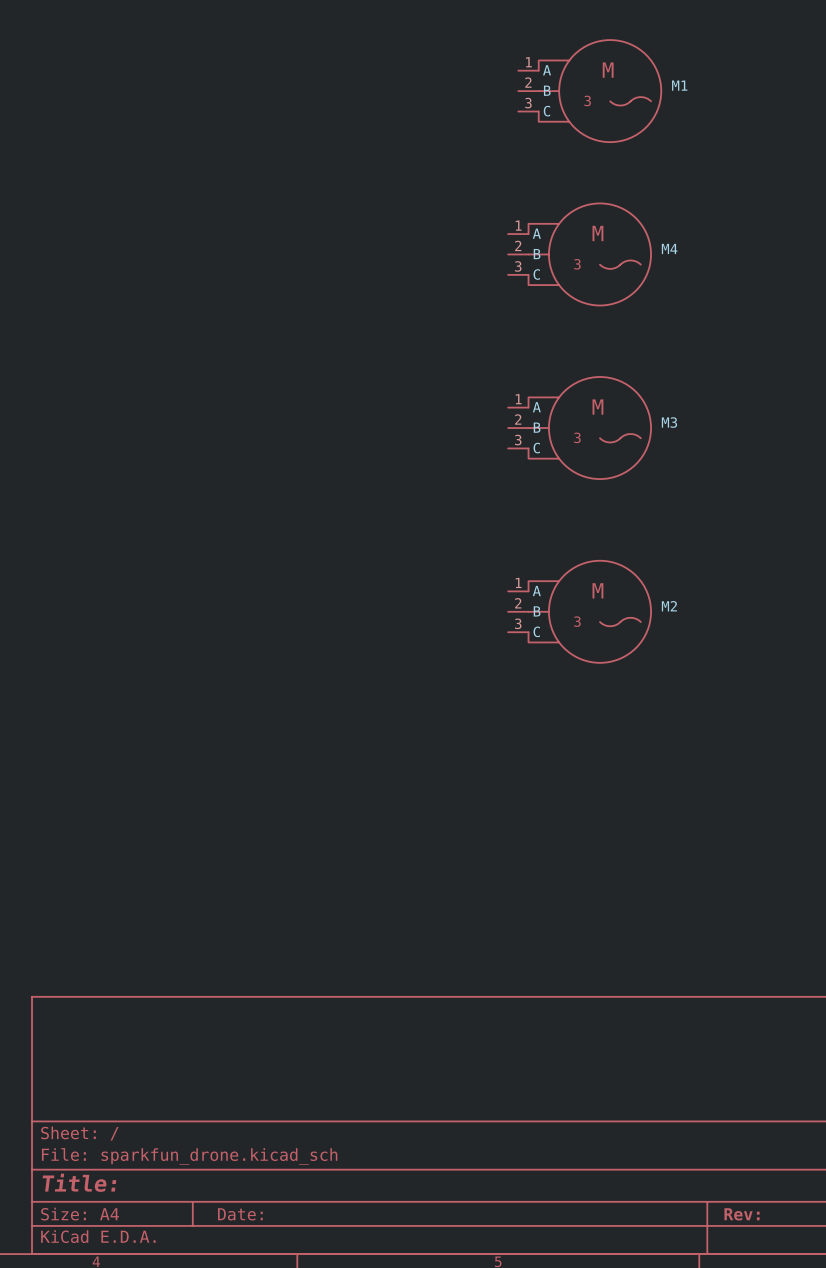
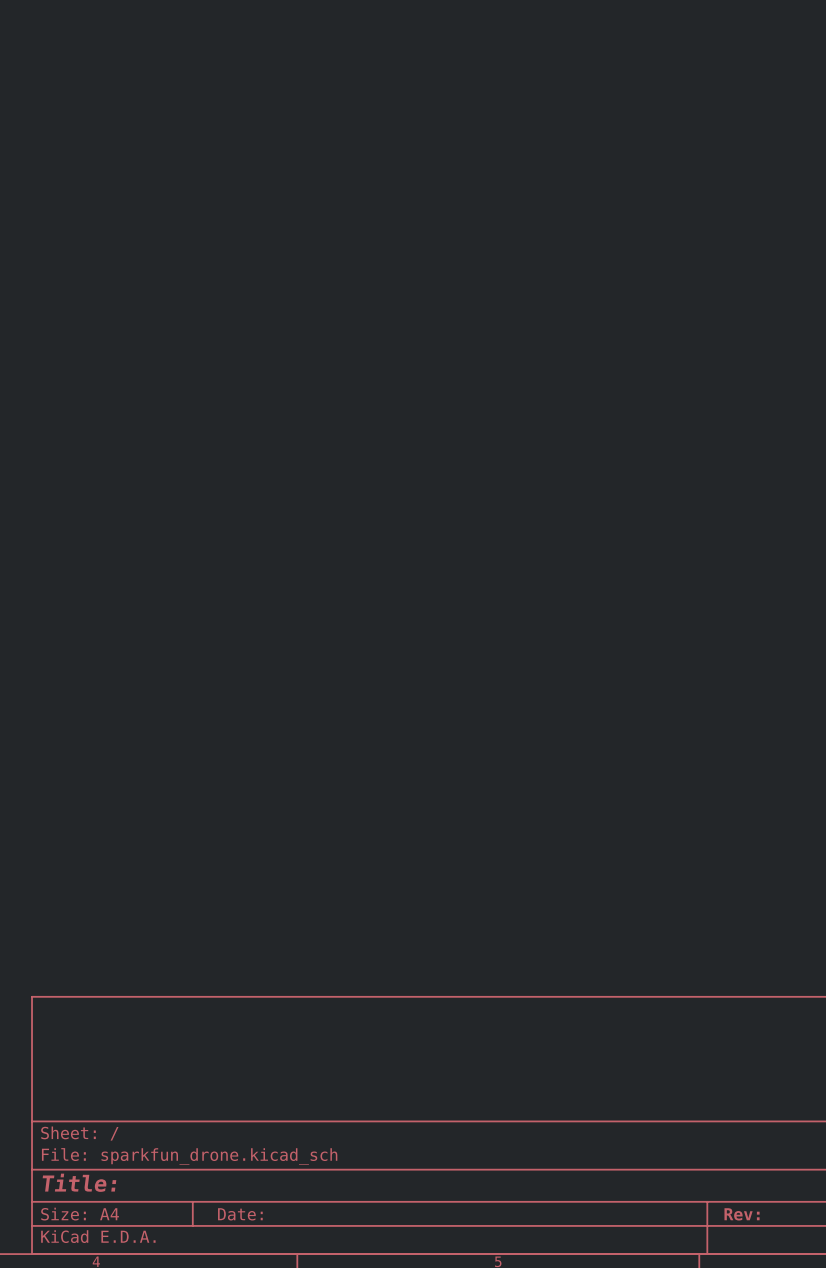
M1: (589, 91) -> none
M4: (579, 254) -> none
M3: (579, 428) -> none
M2: (579, 611) -> none

